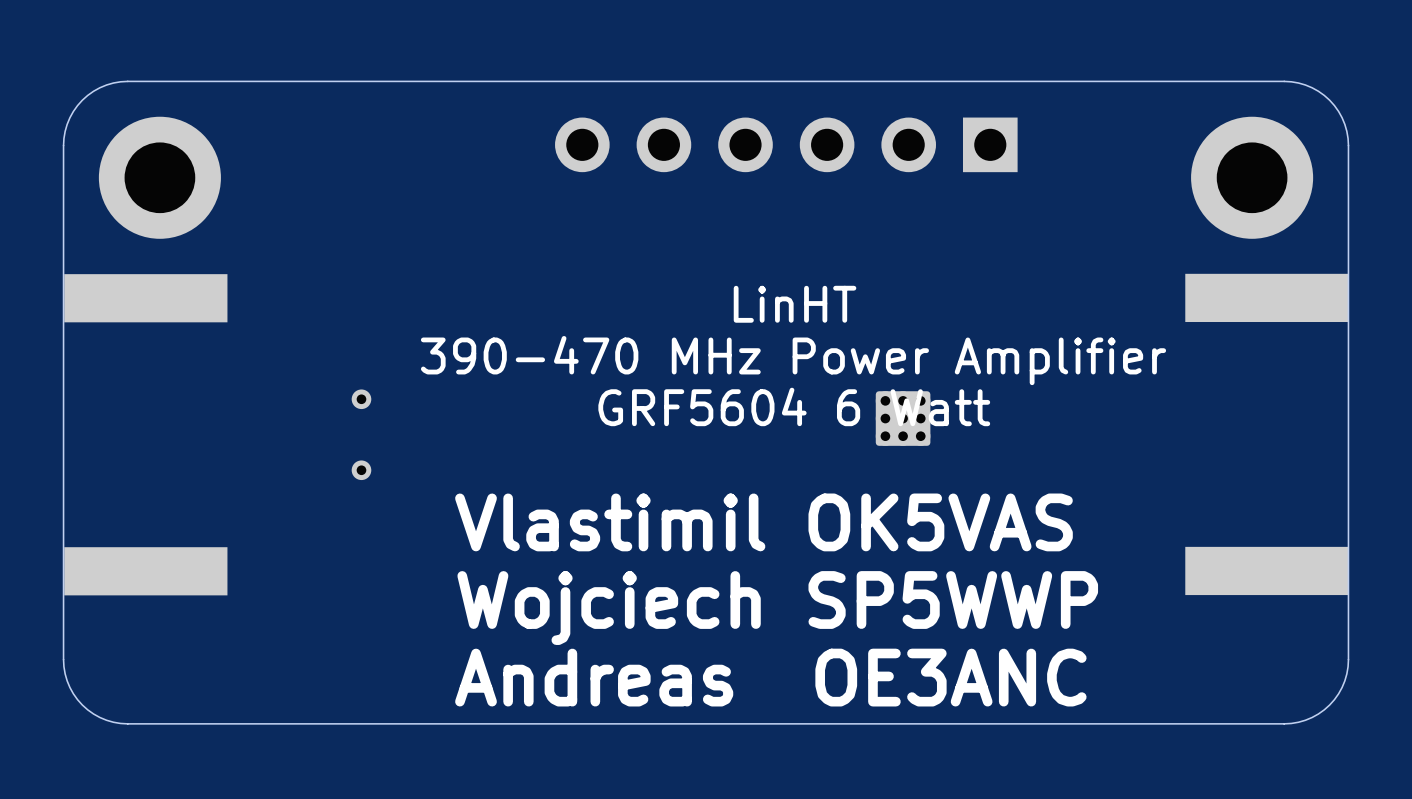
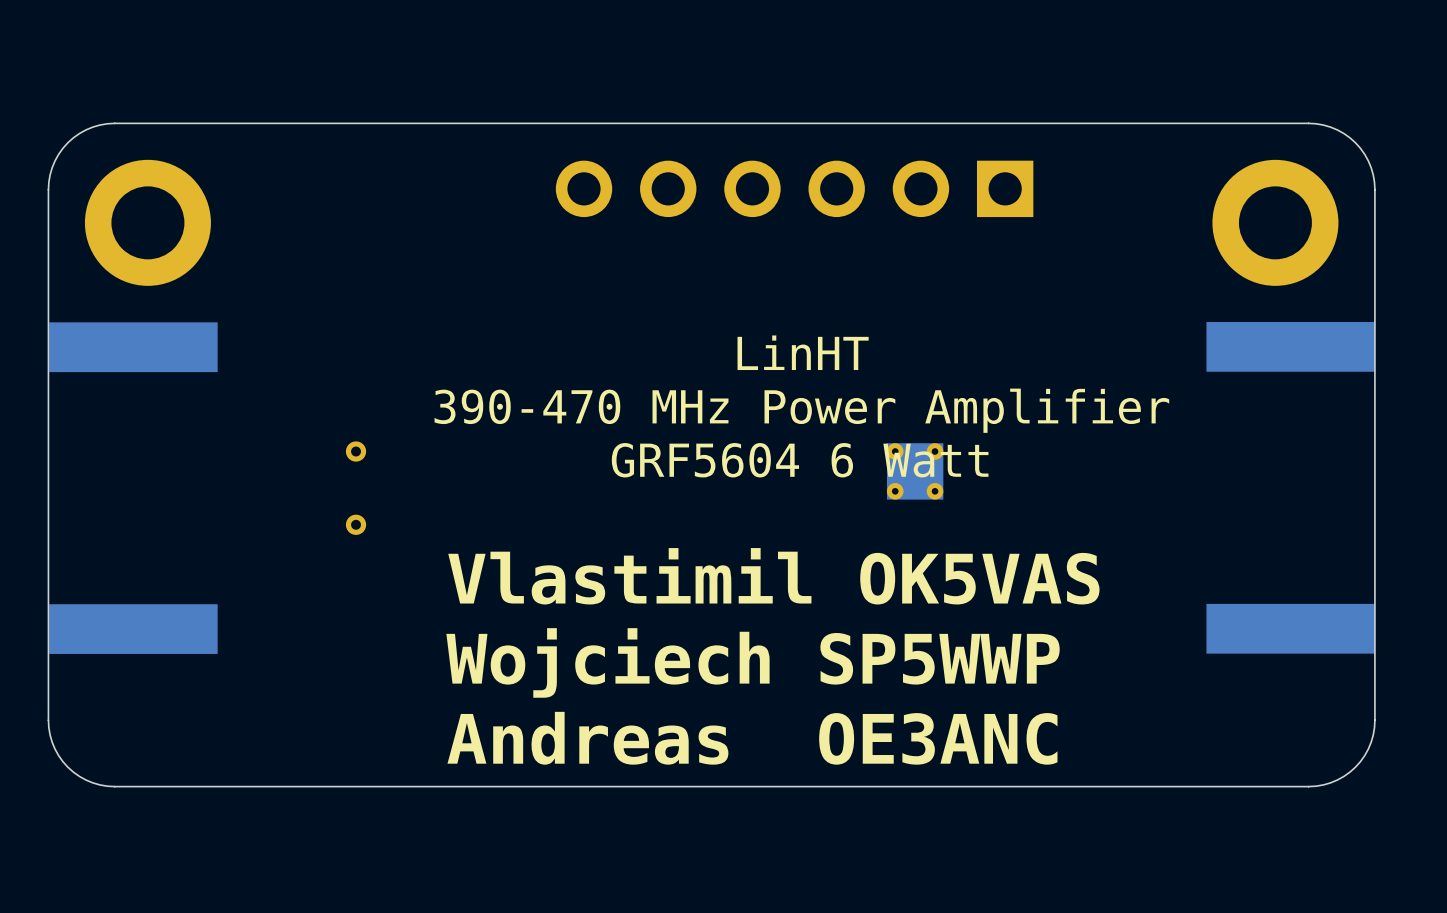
part footprint: [875, 391, 931, 446] -> [886, 443, 944, 500]

